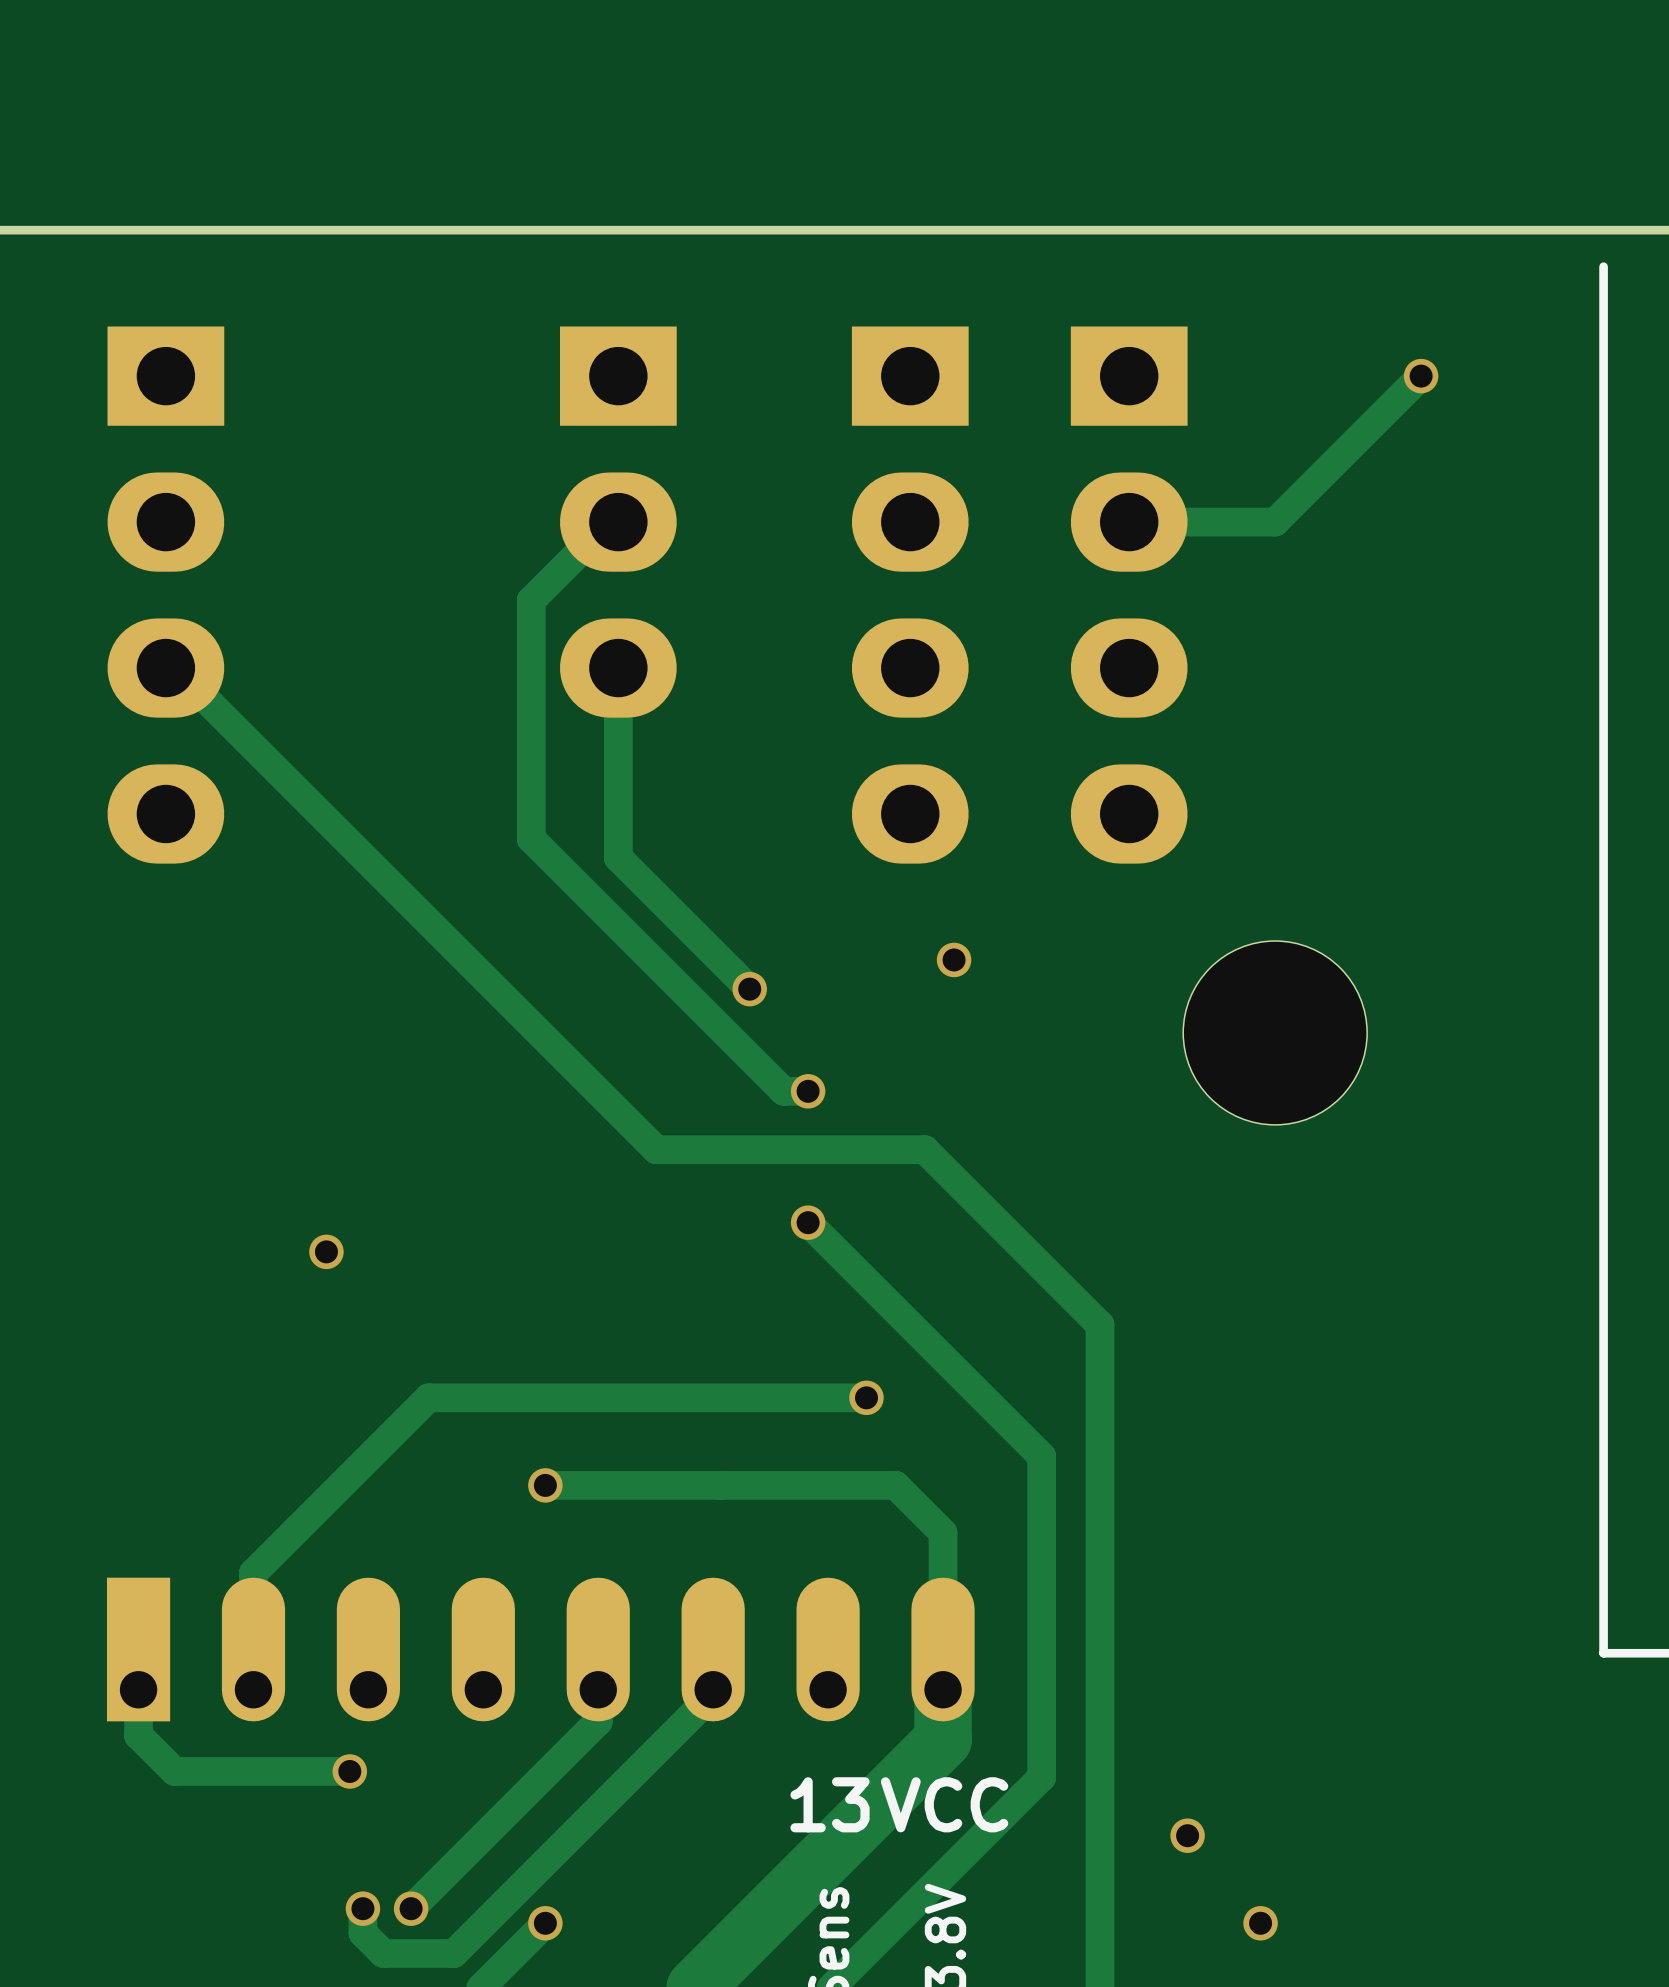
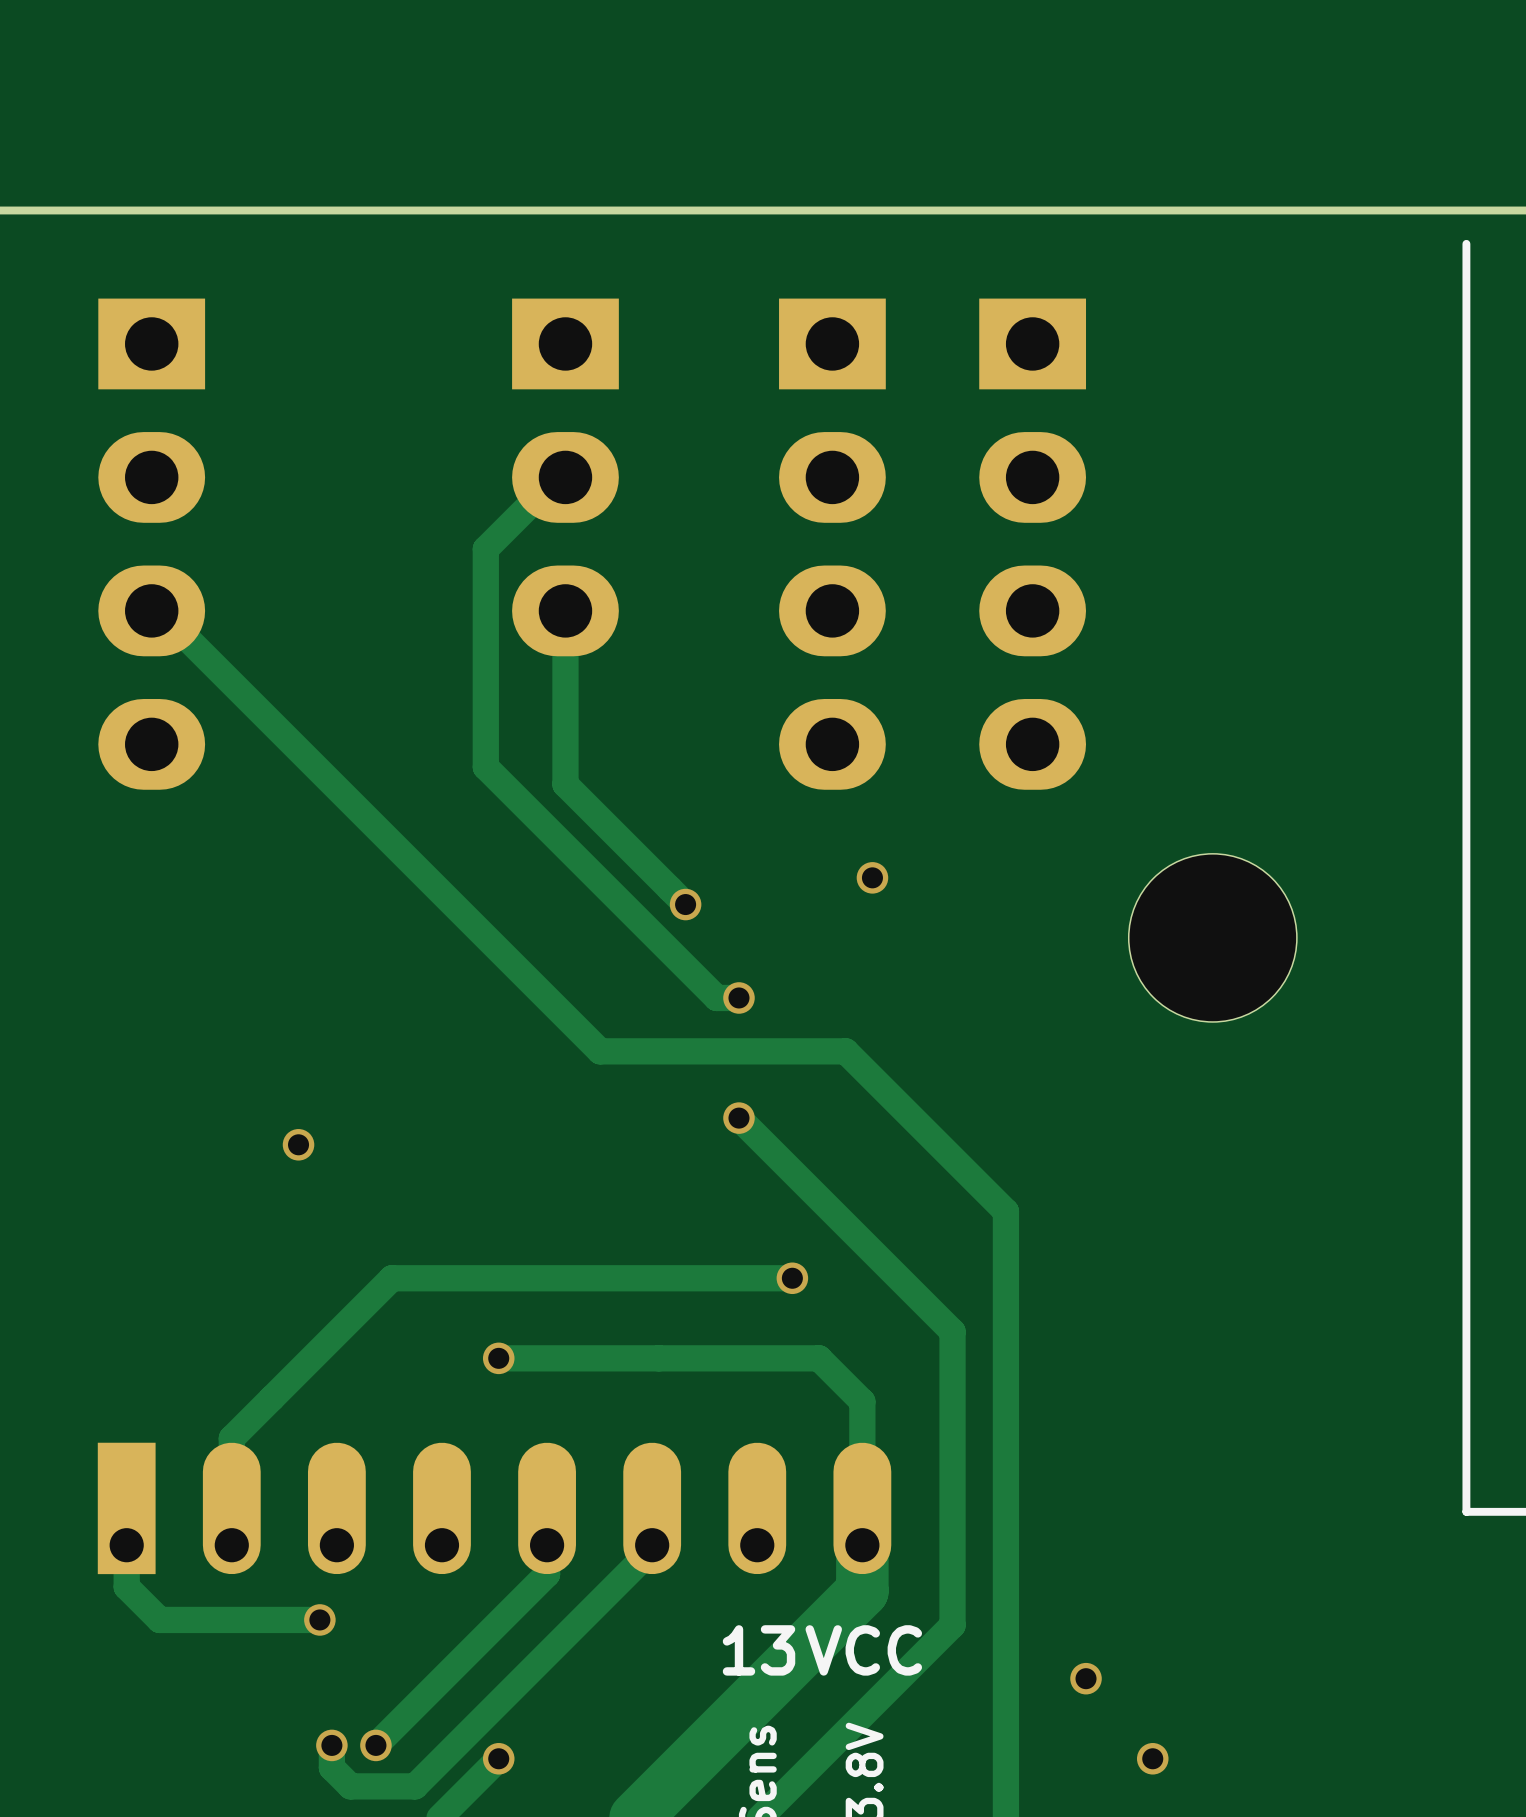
track: (1421, 376) (1275, 522) (1129, 522) -> none
via: (1421, 376) -> none
part position: (1275, 1032) -> (1212, 937)

